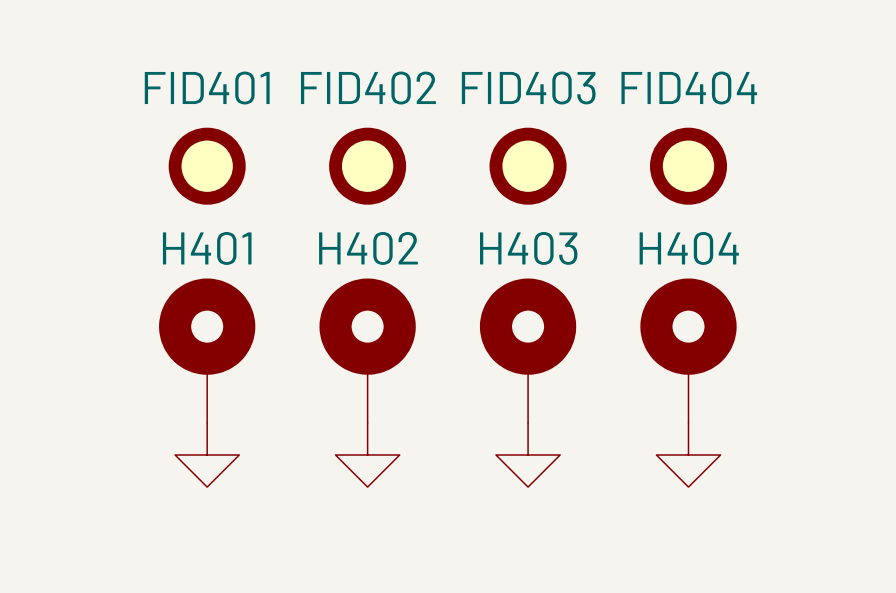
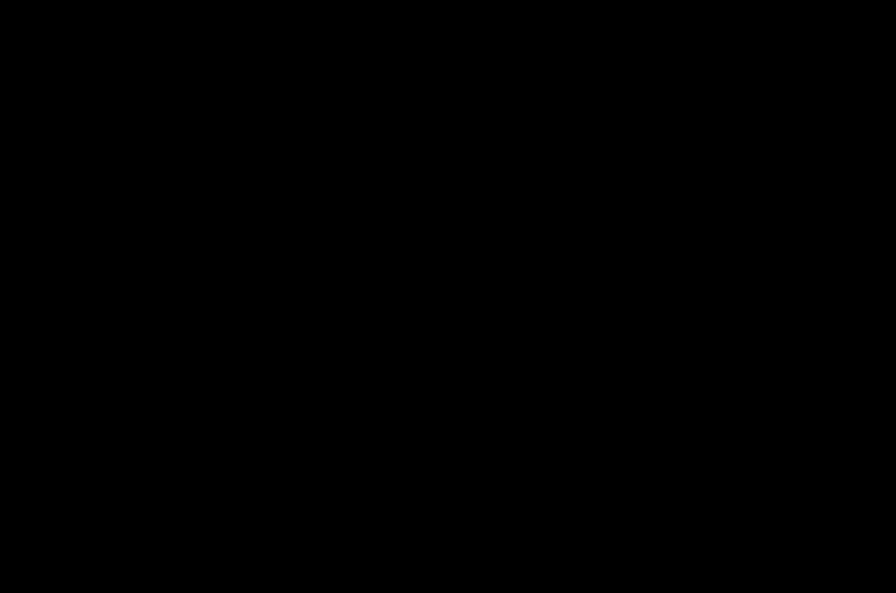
FID401: (207, 166) -> none
FID402: (367, 166) -> none
FID403: (528, 166) -> none
FID404: (688, 166) -> none
H401: (207, 350) -> none
H402: (367, 350) -> none
H403: (528, 350) -> none
H404: (688, 350) -> none
power symbol: (207, 454) -> none
power symbol: (367, 454) -> none
power symbol: (528, 454) -> none
power symbol: (688, 454) -> none

